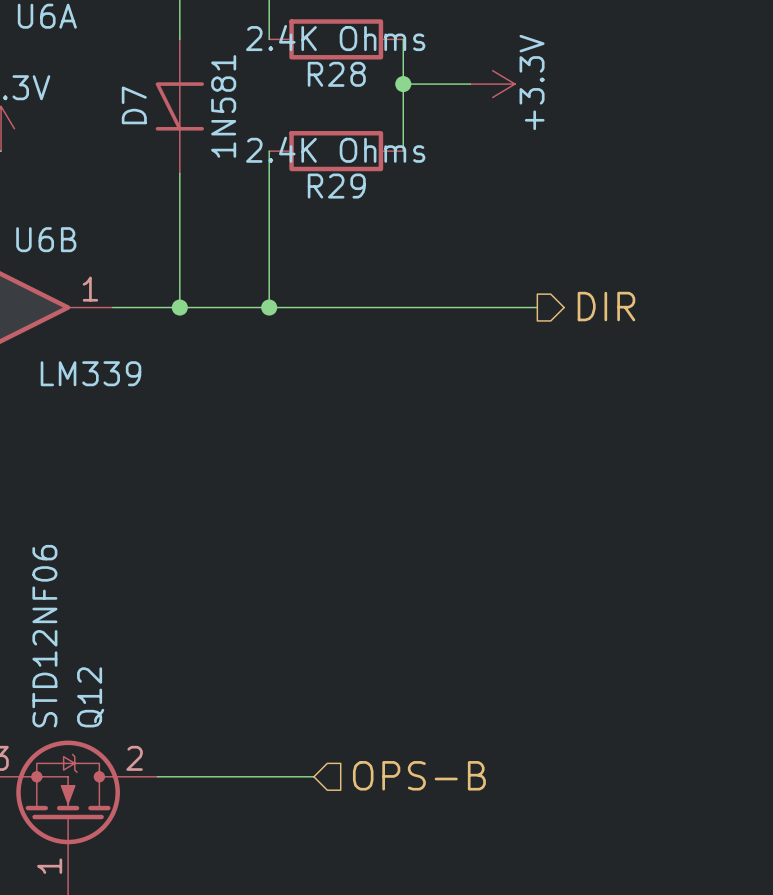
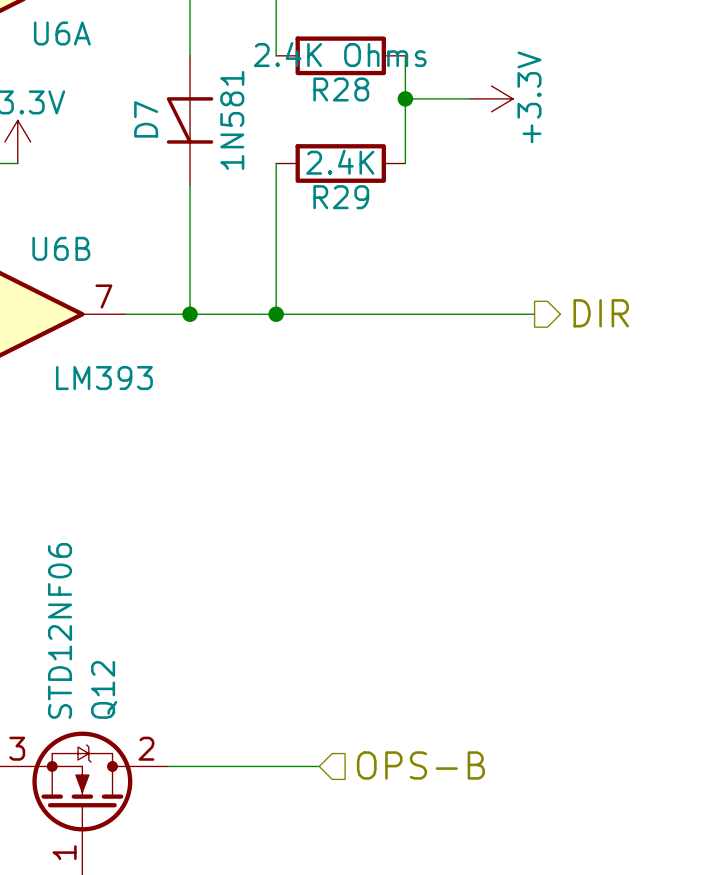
R29 value: 2.4K Ohms (335, 149) -> 2.4K (340, 162)
U6B pin number: 1 (90, 289) -> 7 (103, 296)
U6B value: LM339 (90, 373) -> LM393 (104, 378)

